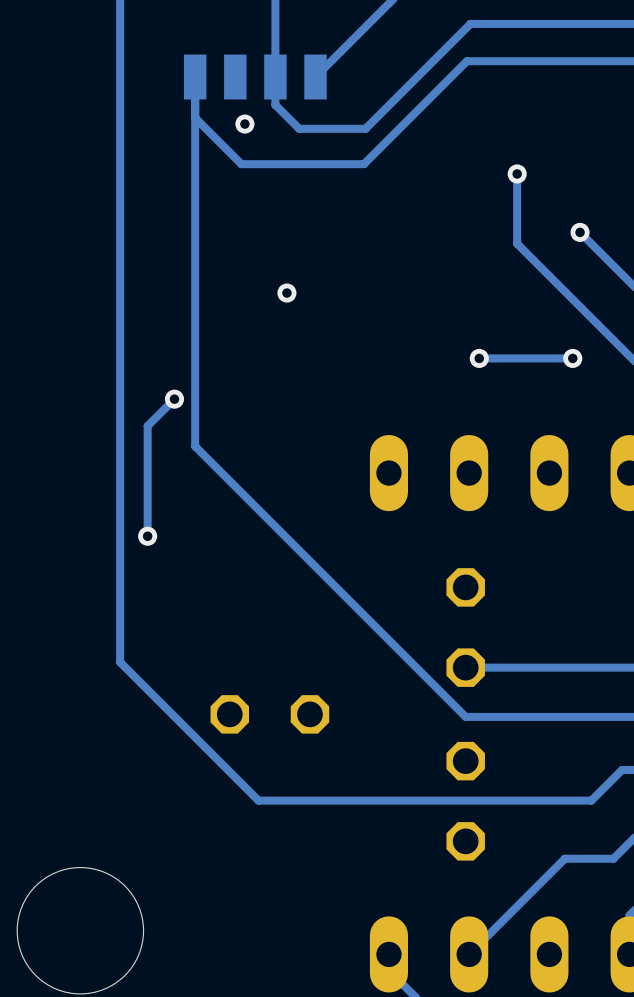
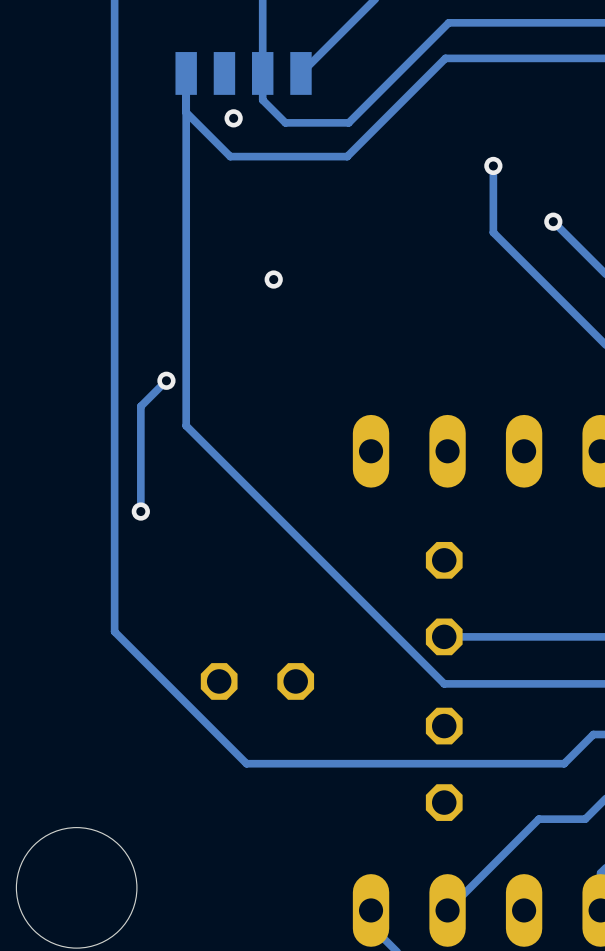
via: (479, 358) -> none
track: (572, 358) (479, 358) -> none
via: (572, 358) -> none

